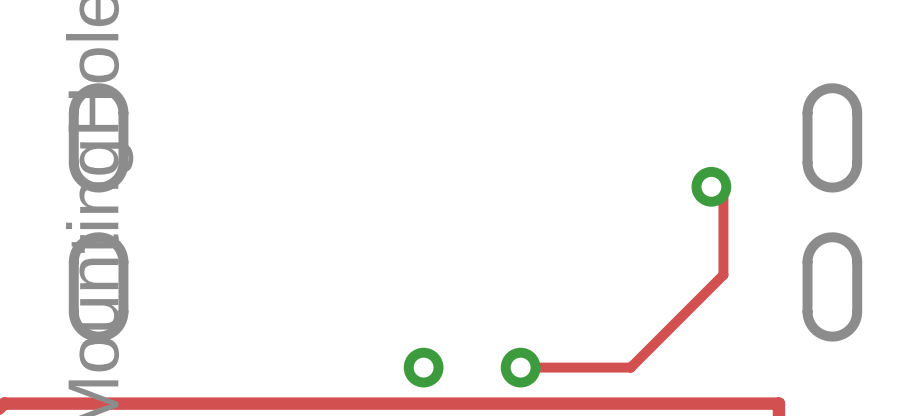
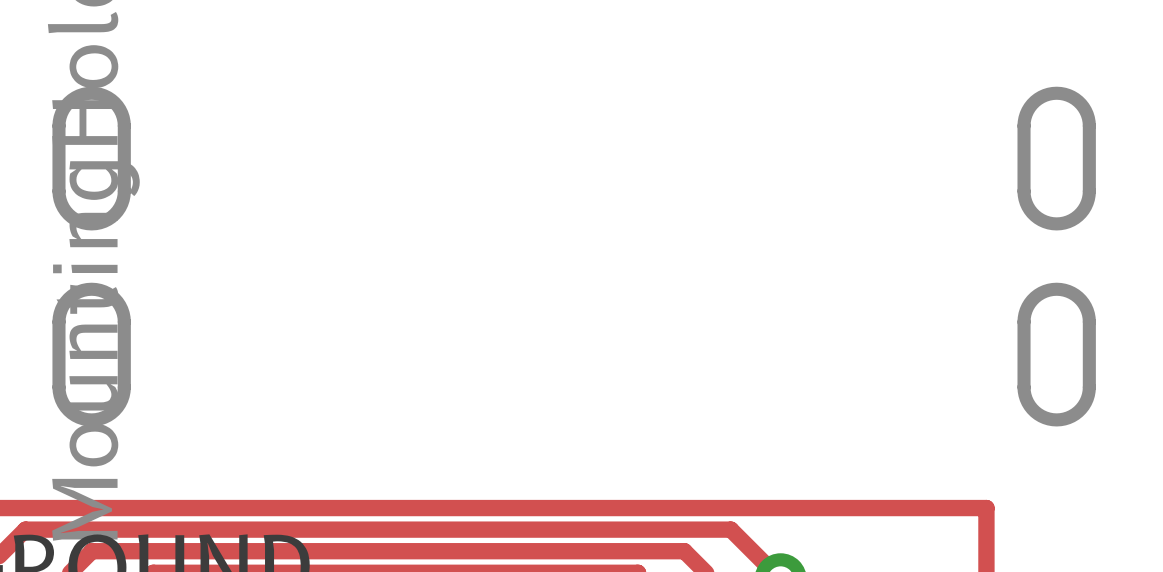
track: (723, 181) (723, 274) (630, 367) (520, 367) -> none
via: (711, 186) -> none
via: (423, 367) -> none
via: (520, 367) -> none

